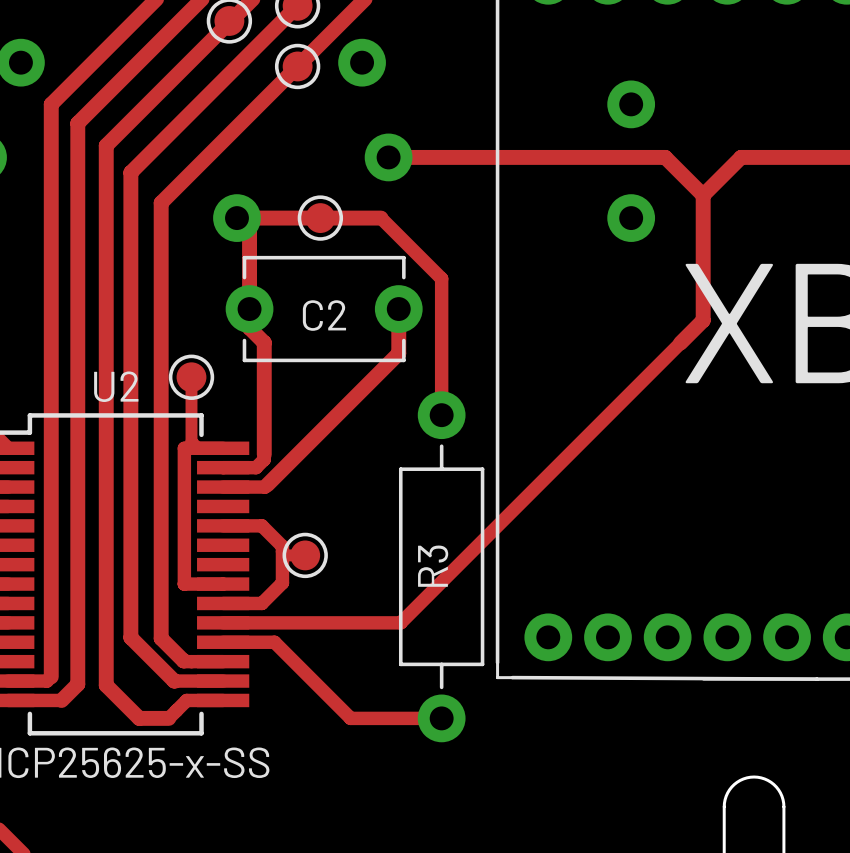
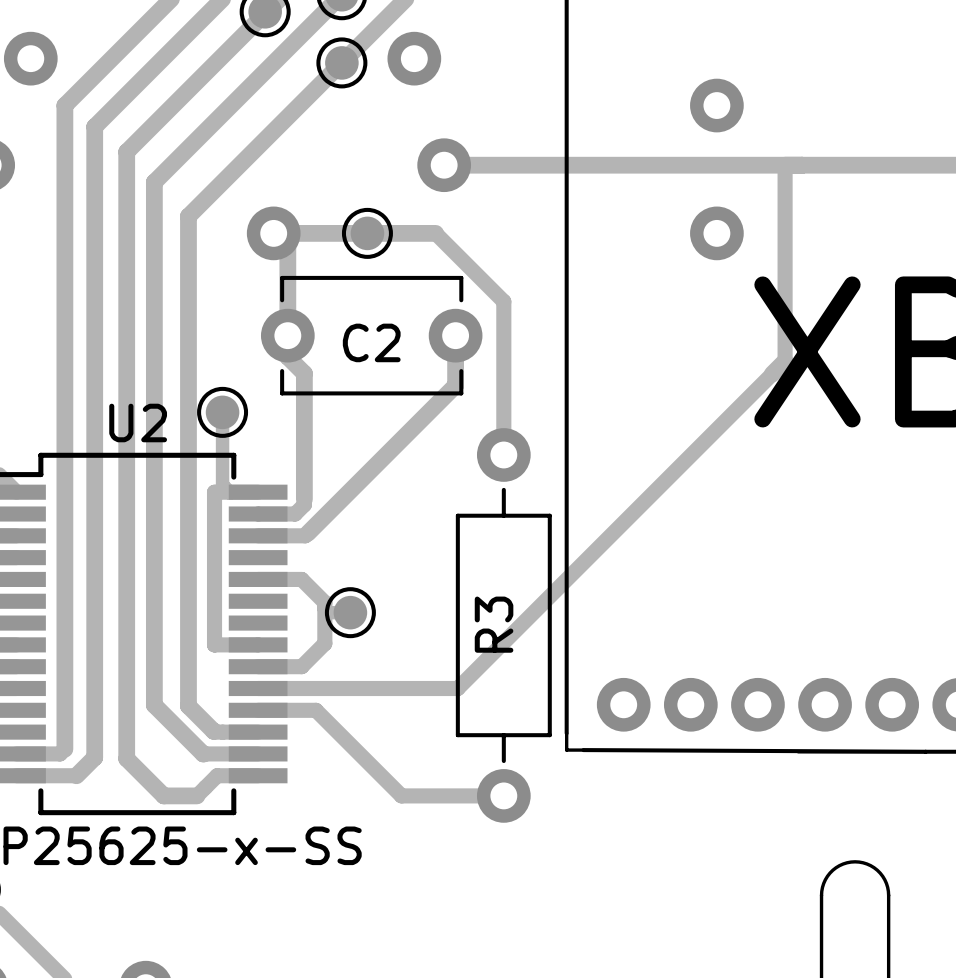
track: (665, 157) (703, 195) -> none
track: (741, 157) (703, 195) -> (840, 165) (755, 165)
track: (703, 195) (703, 320) (691, 331) -> (785, 165) (785, 361)

